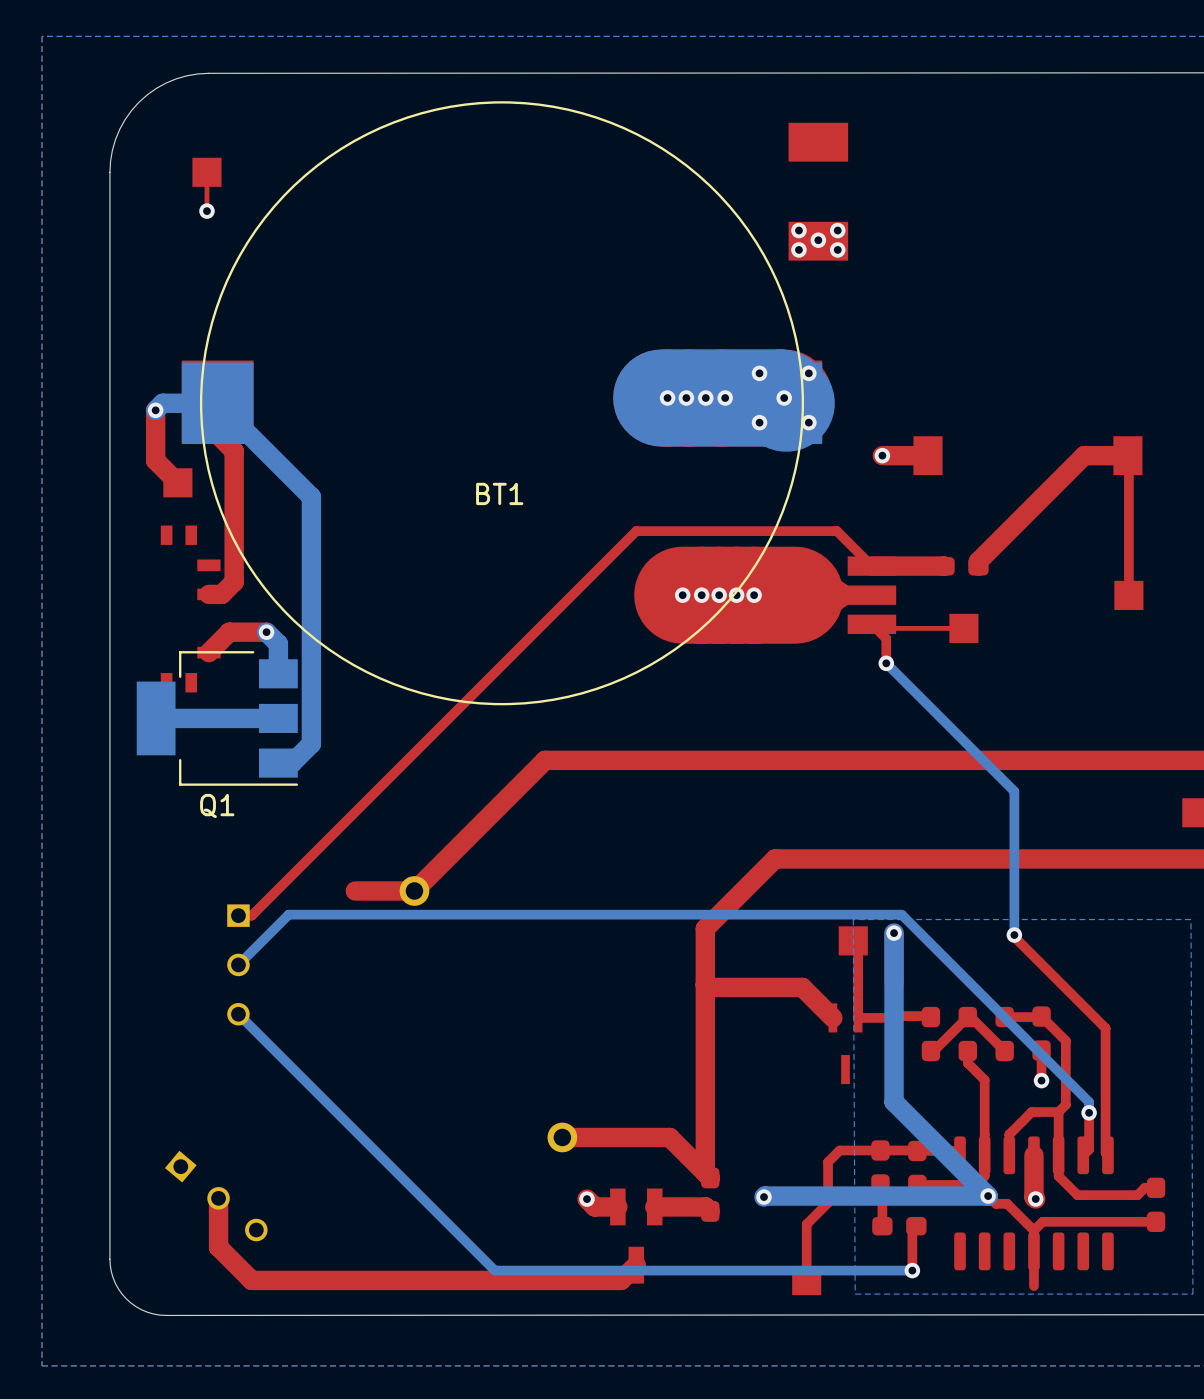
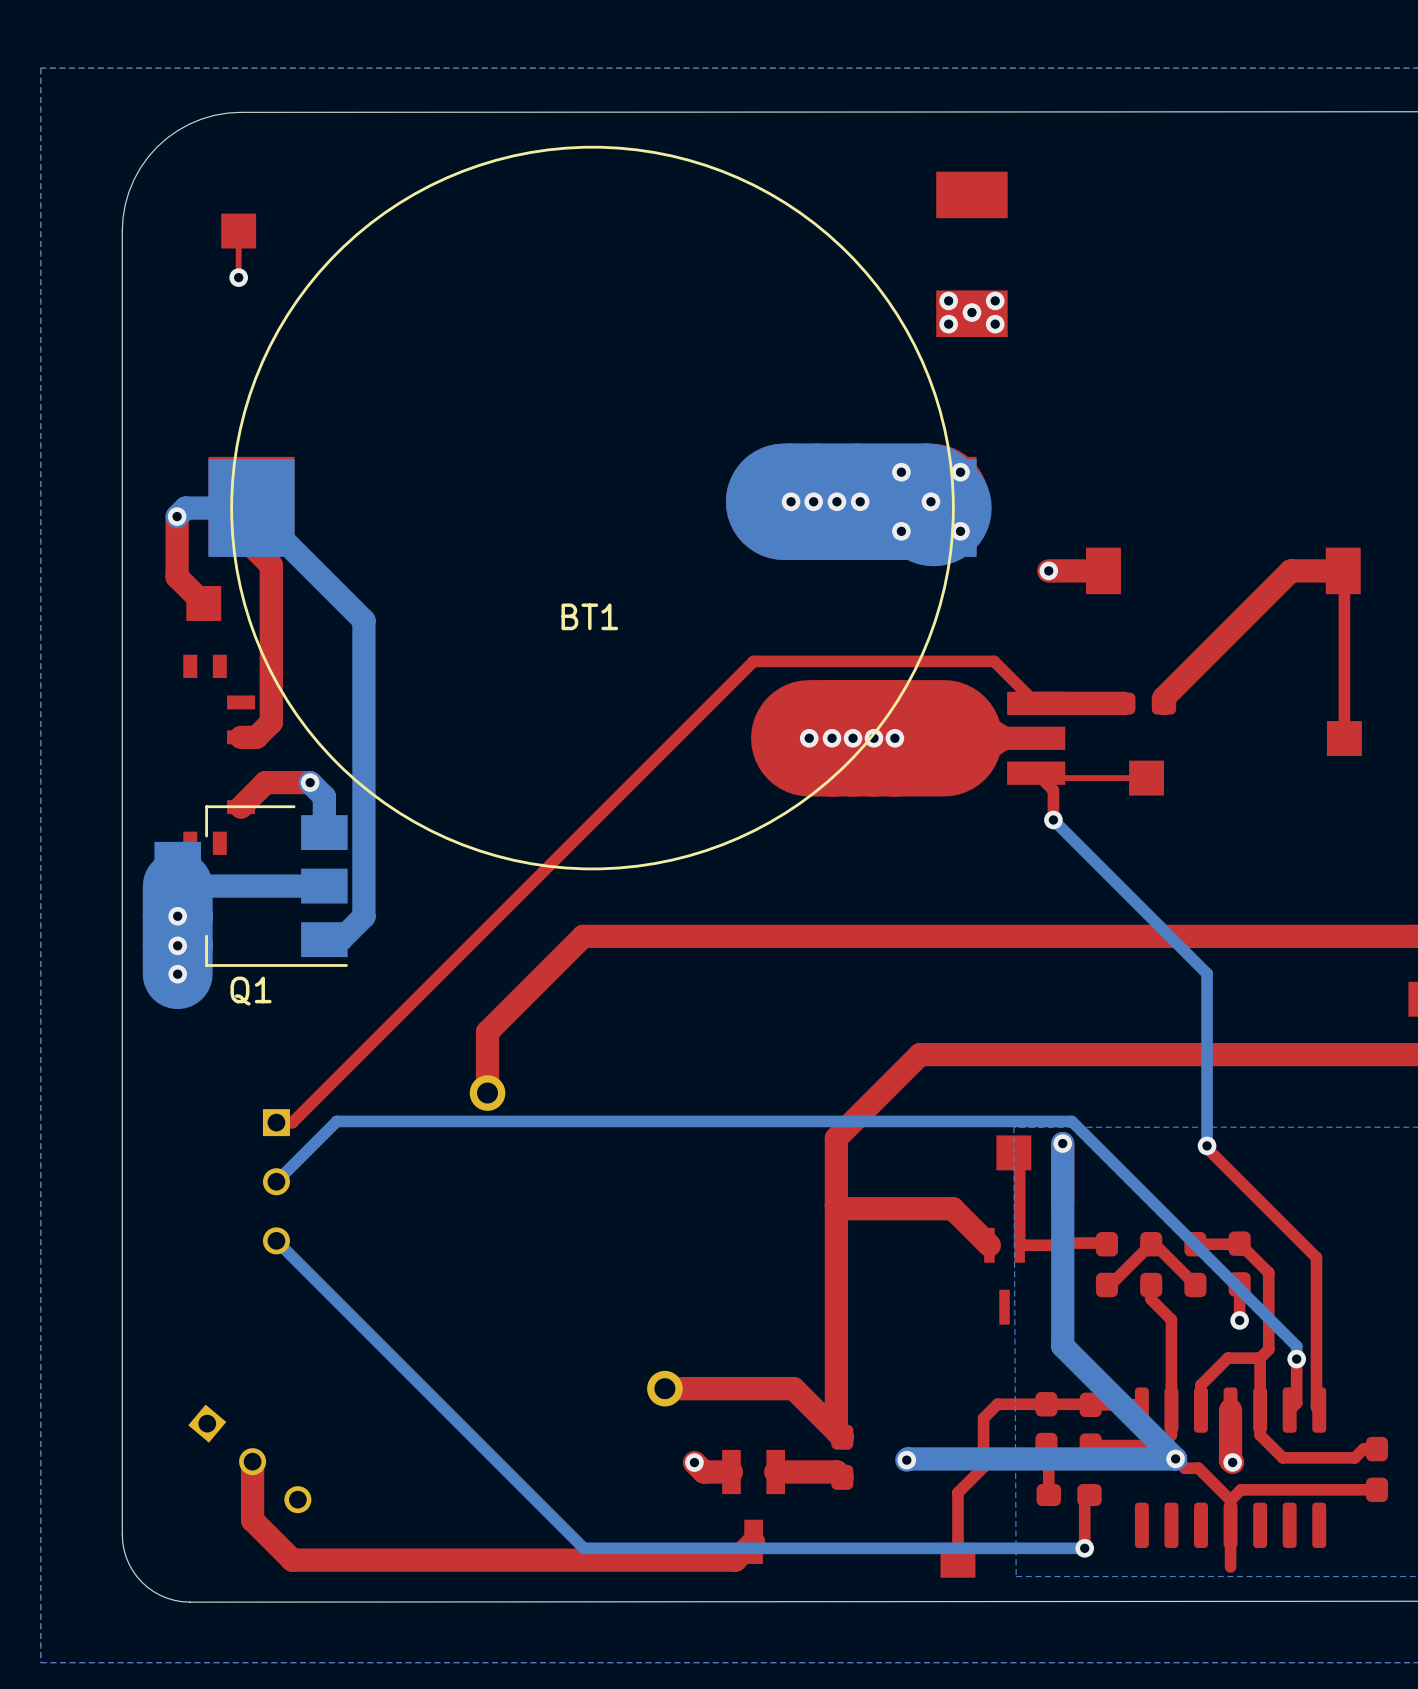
bottom track: none -> (177, 886) (177, 974)
via: none -> (177, 916)
top track: (545, 760) (414, 890) (355, 890) -> (644, 936) (583, 936) (487, 1032) (487, 1093)
via: none -> (177, 945)
via: none -> (177, 974)

